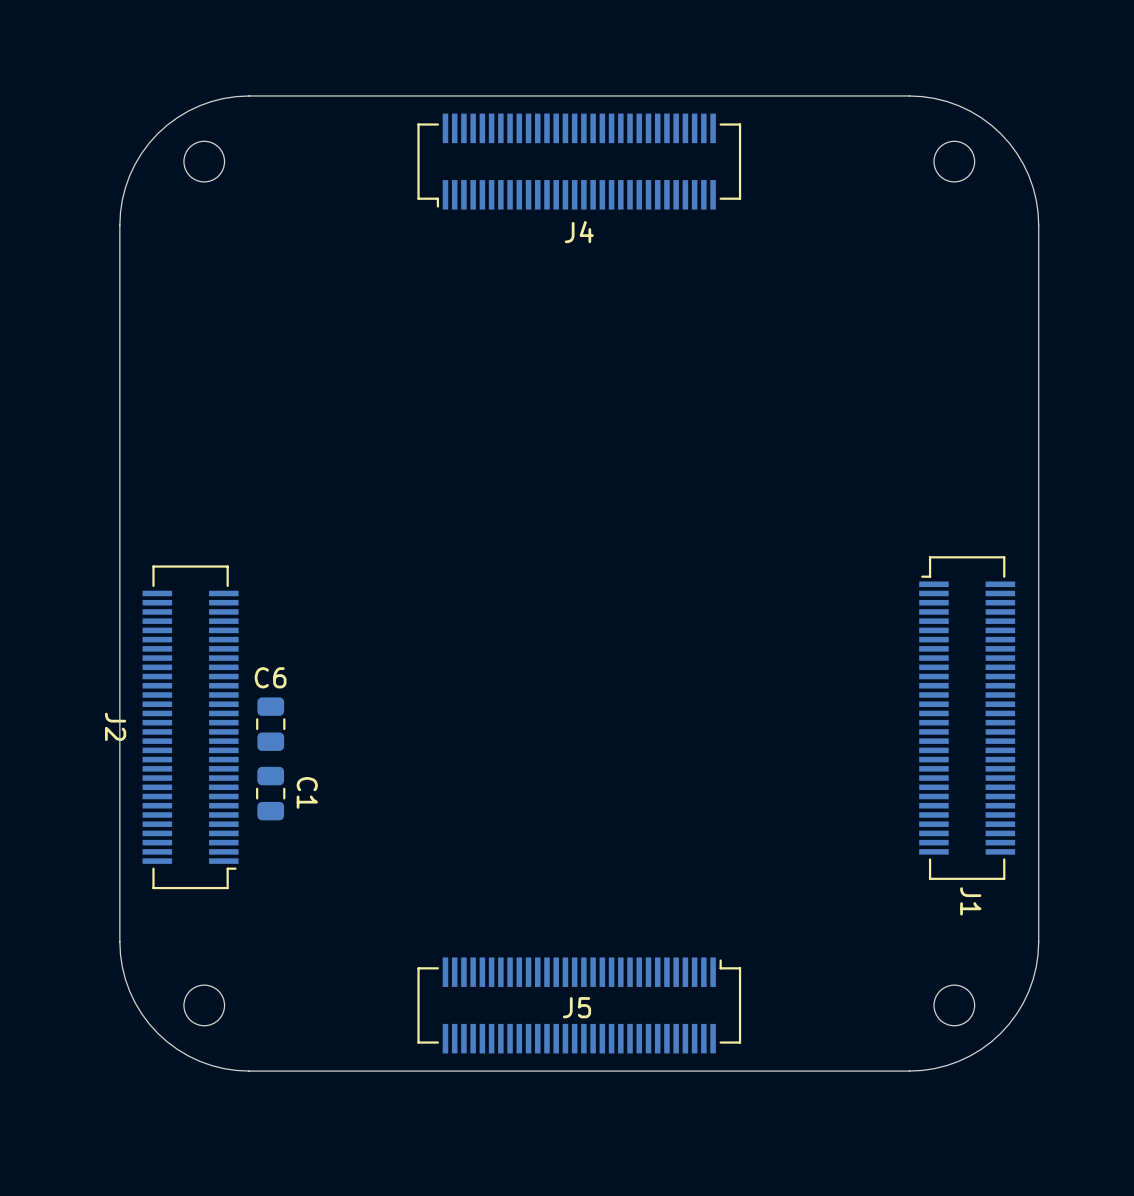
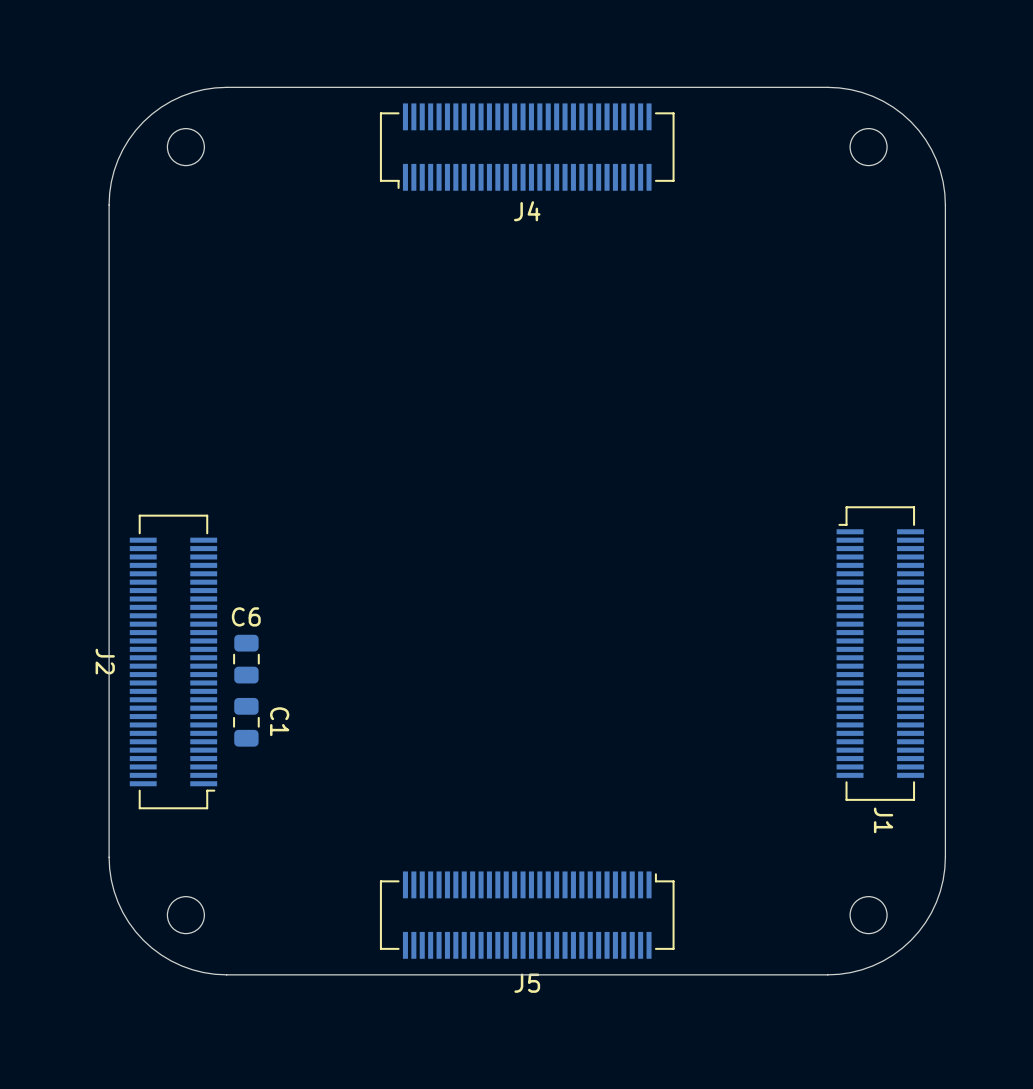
J5 name position: J5 (576, 1007) -> J5 (527, 983)

